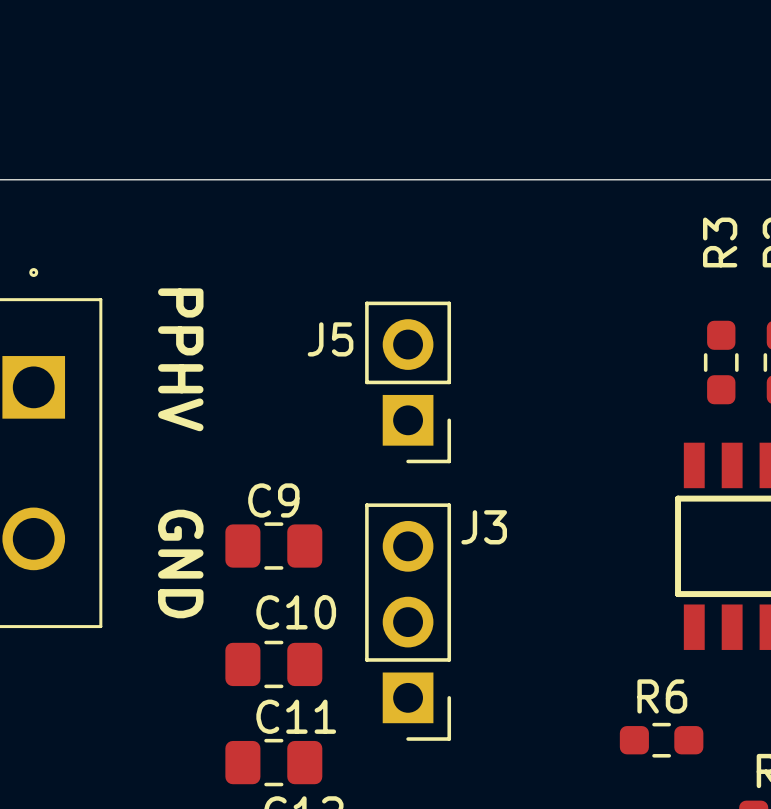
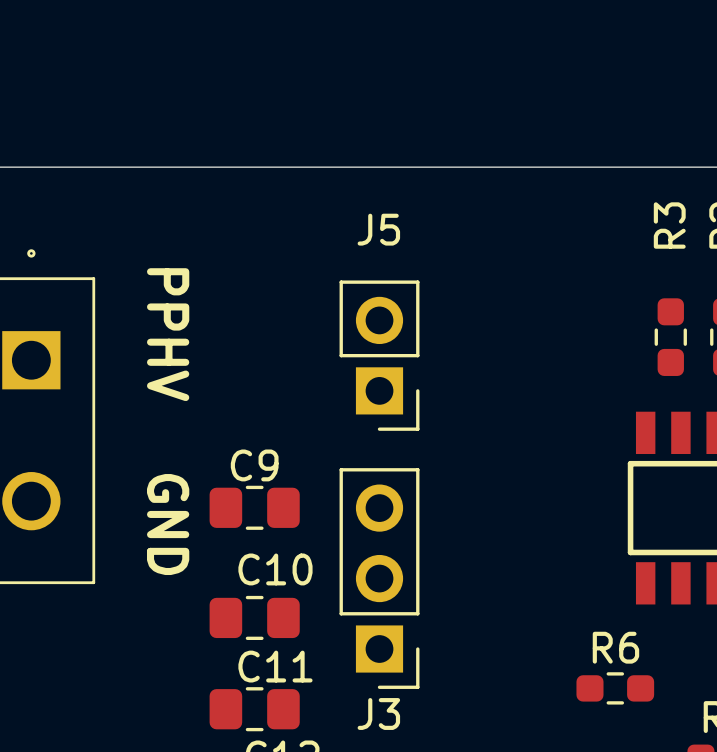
J5 name position: J5 (330, 339) -> J5 (378, 229)
J3 name position: J3 (484, 527) -> J3 (378, 713)

